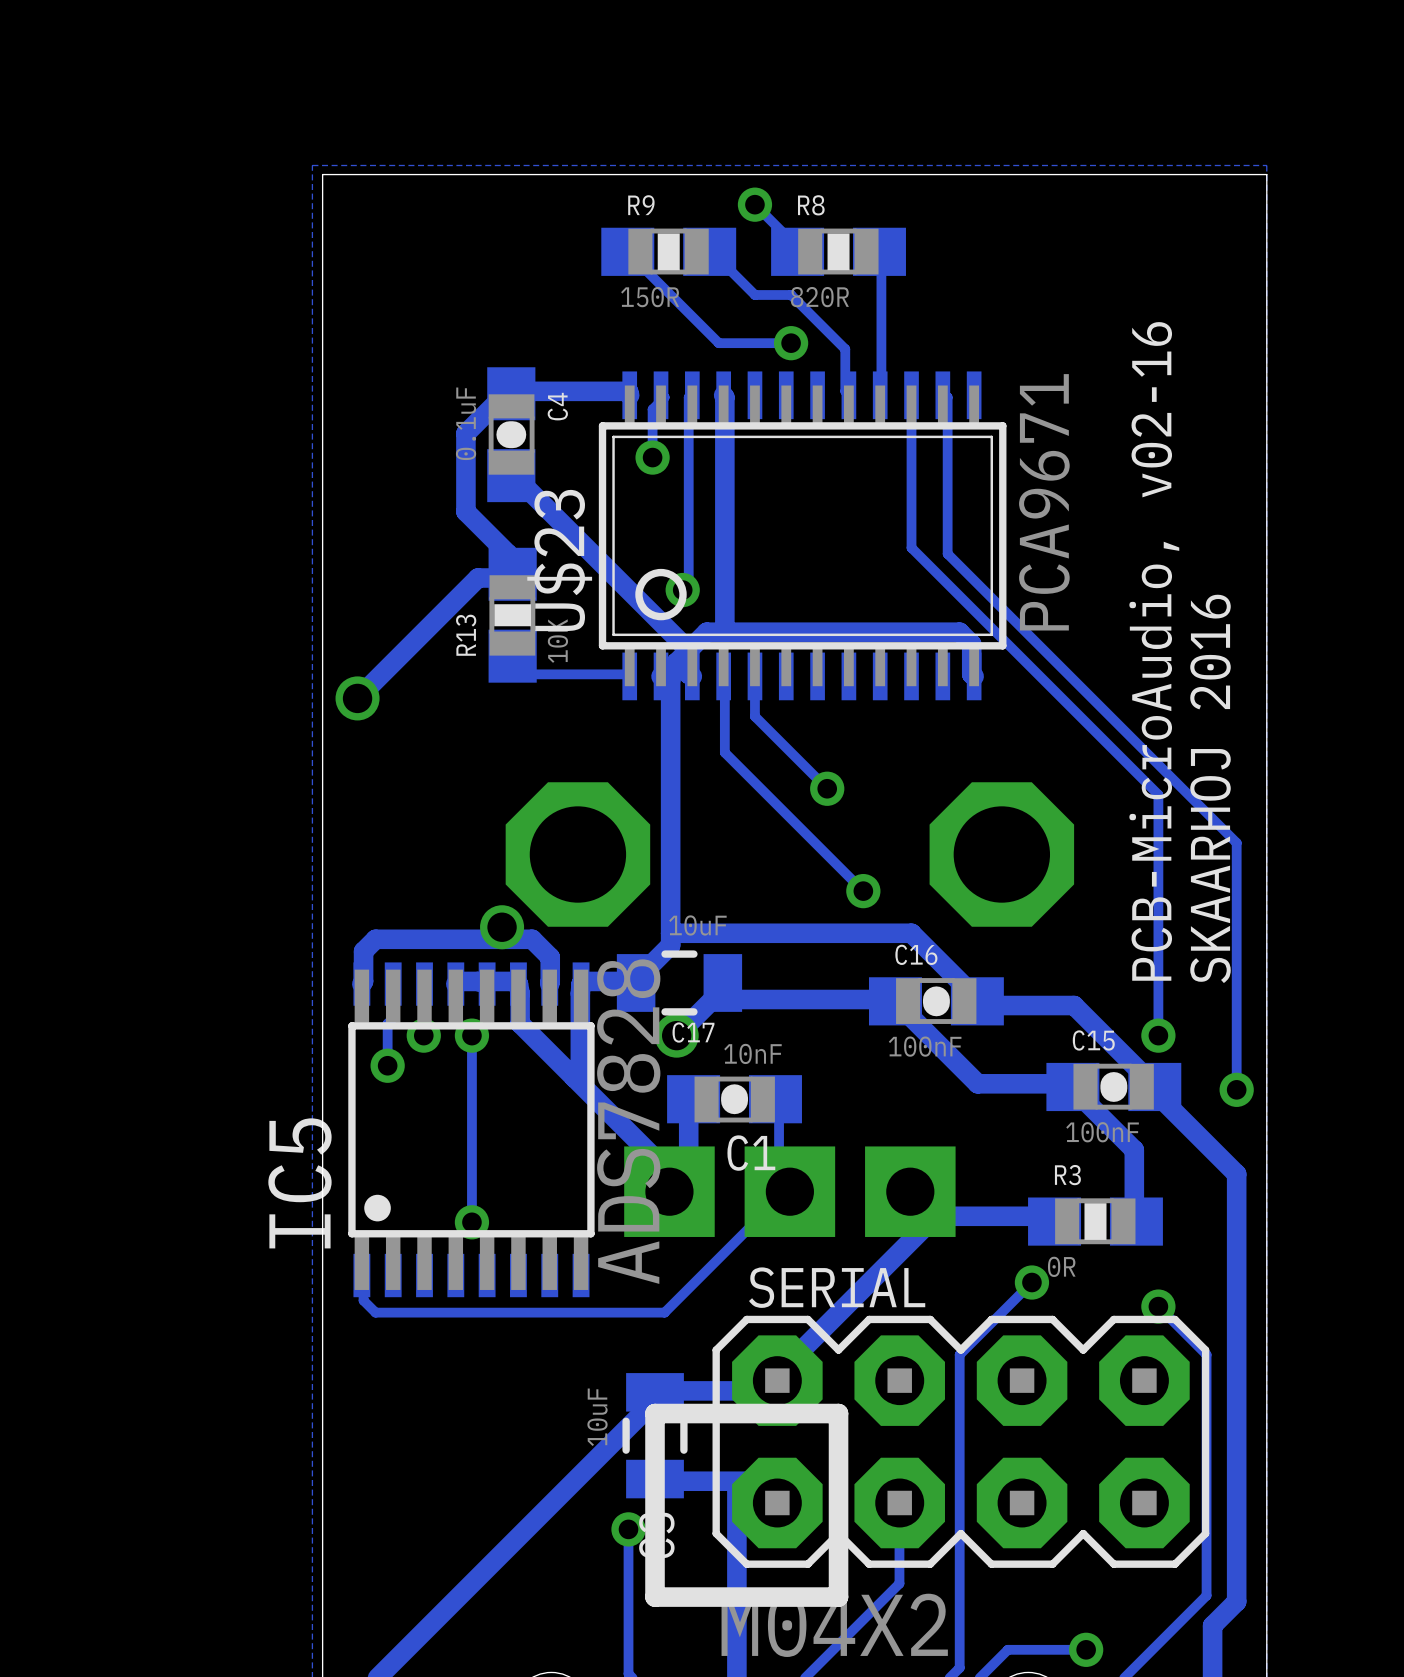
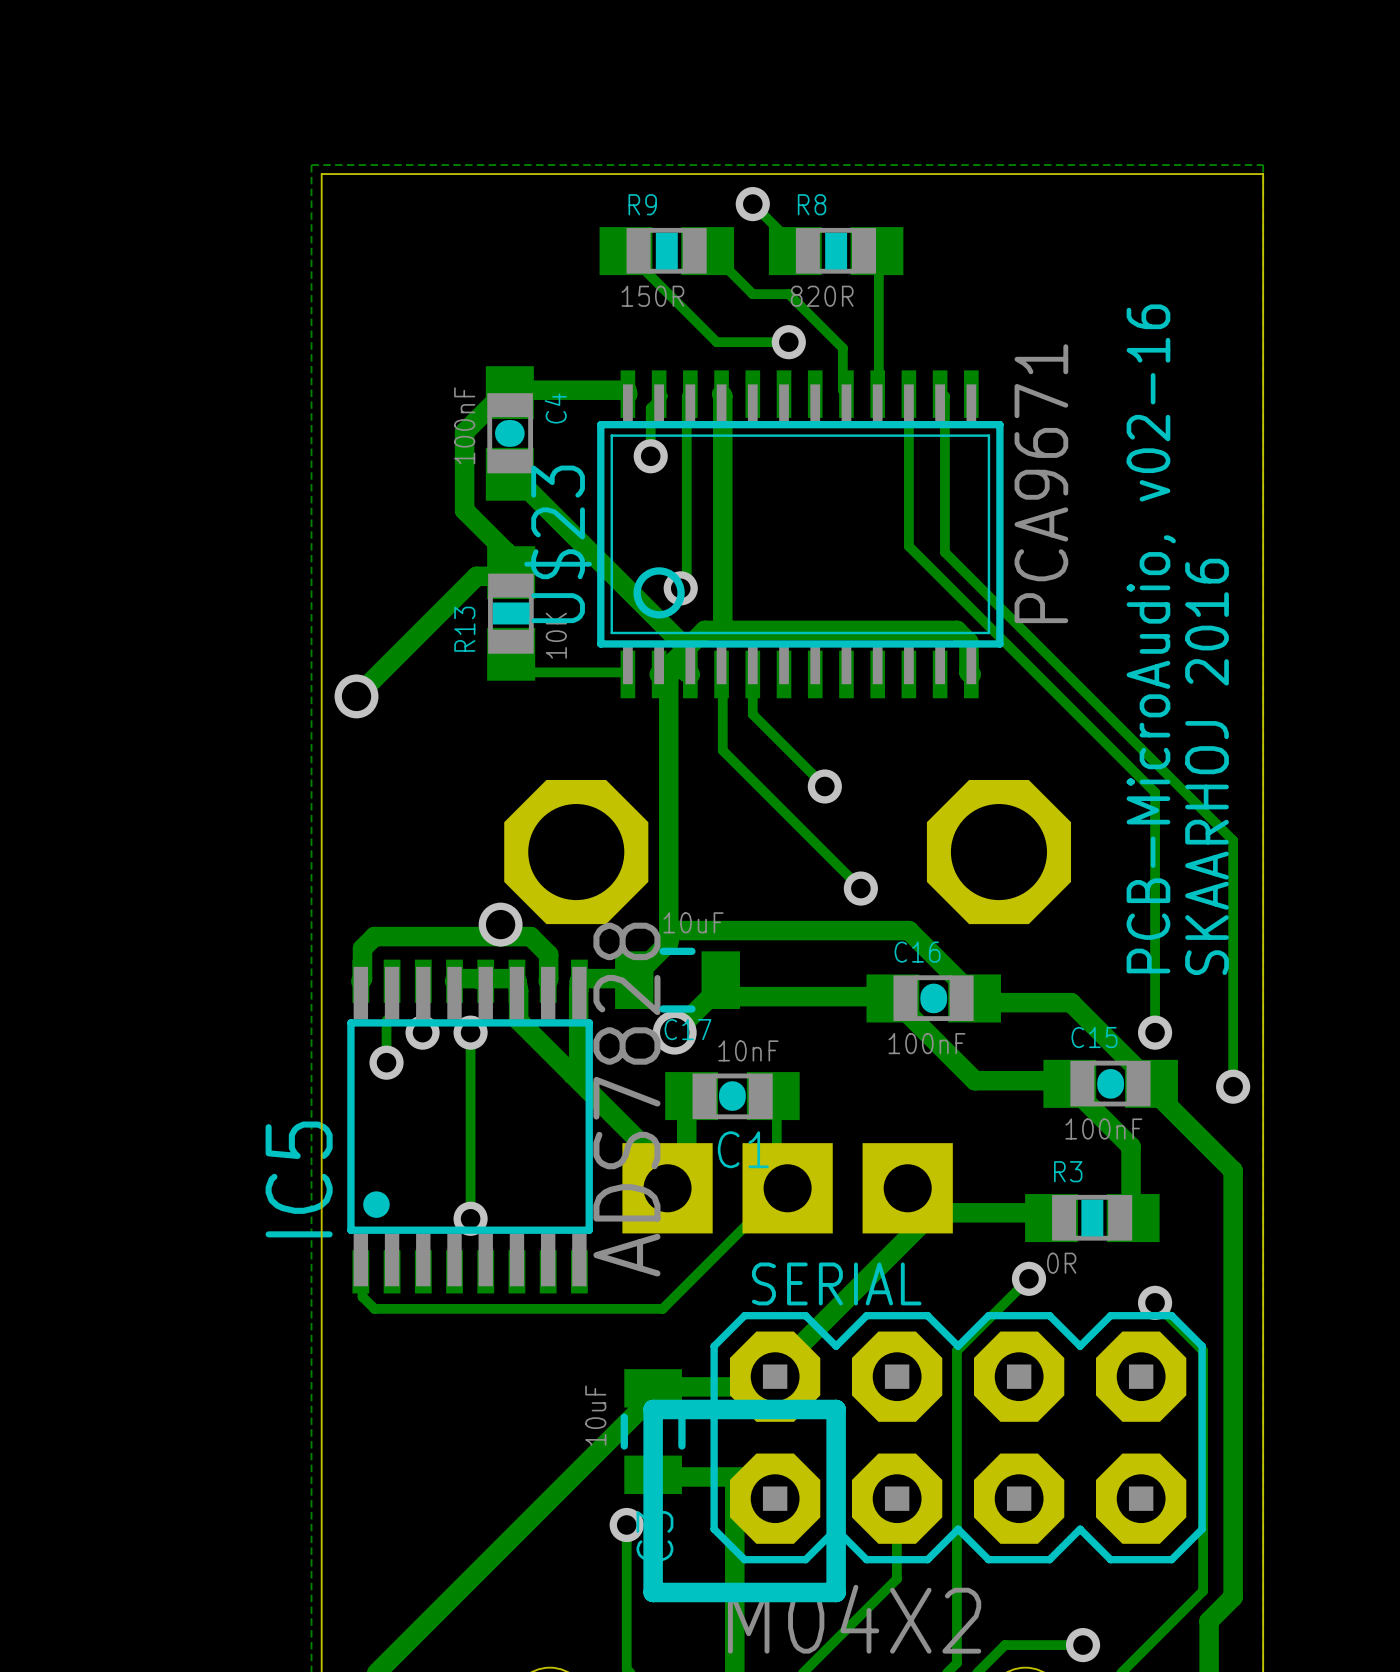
C4 value: 0.1uF (466, 423) -> 100nF (464, 425)

